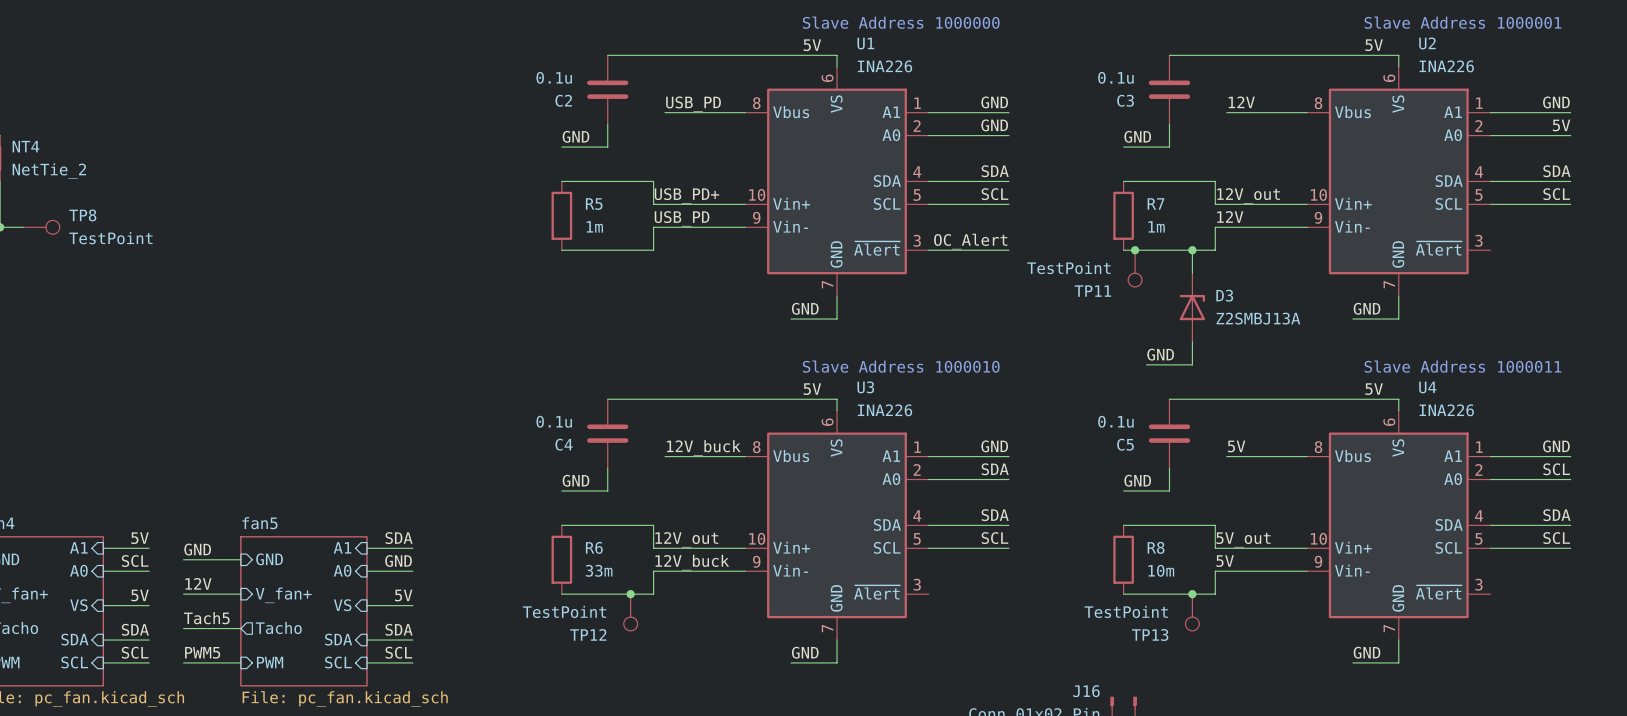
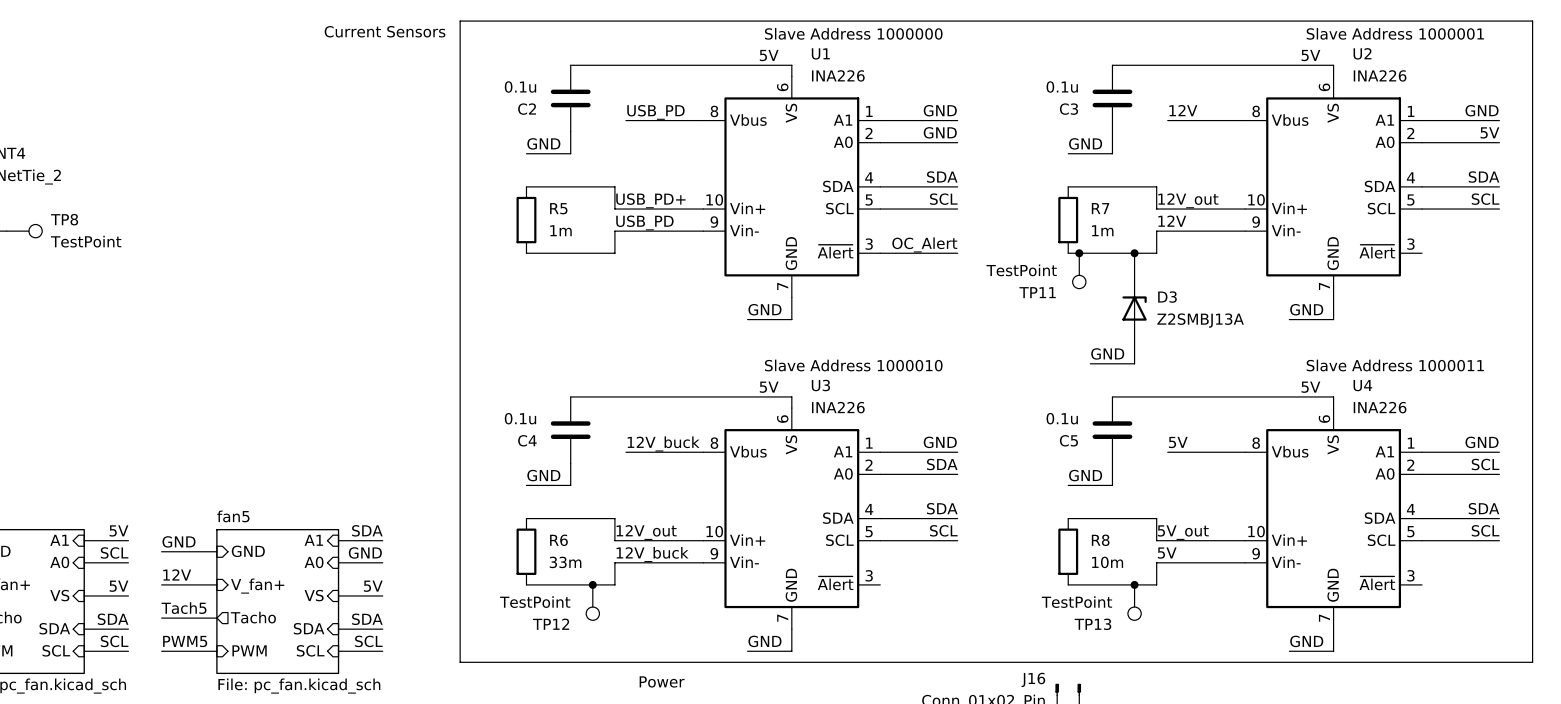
line: none -> (460, 21) (1532, 21) (1532, 662) (460, 662) (460, 21)
text: none -> Current Sensors (385, 31)
text: none -> Power (662, 681)

